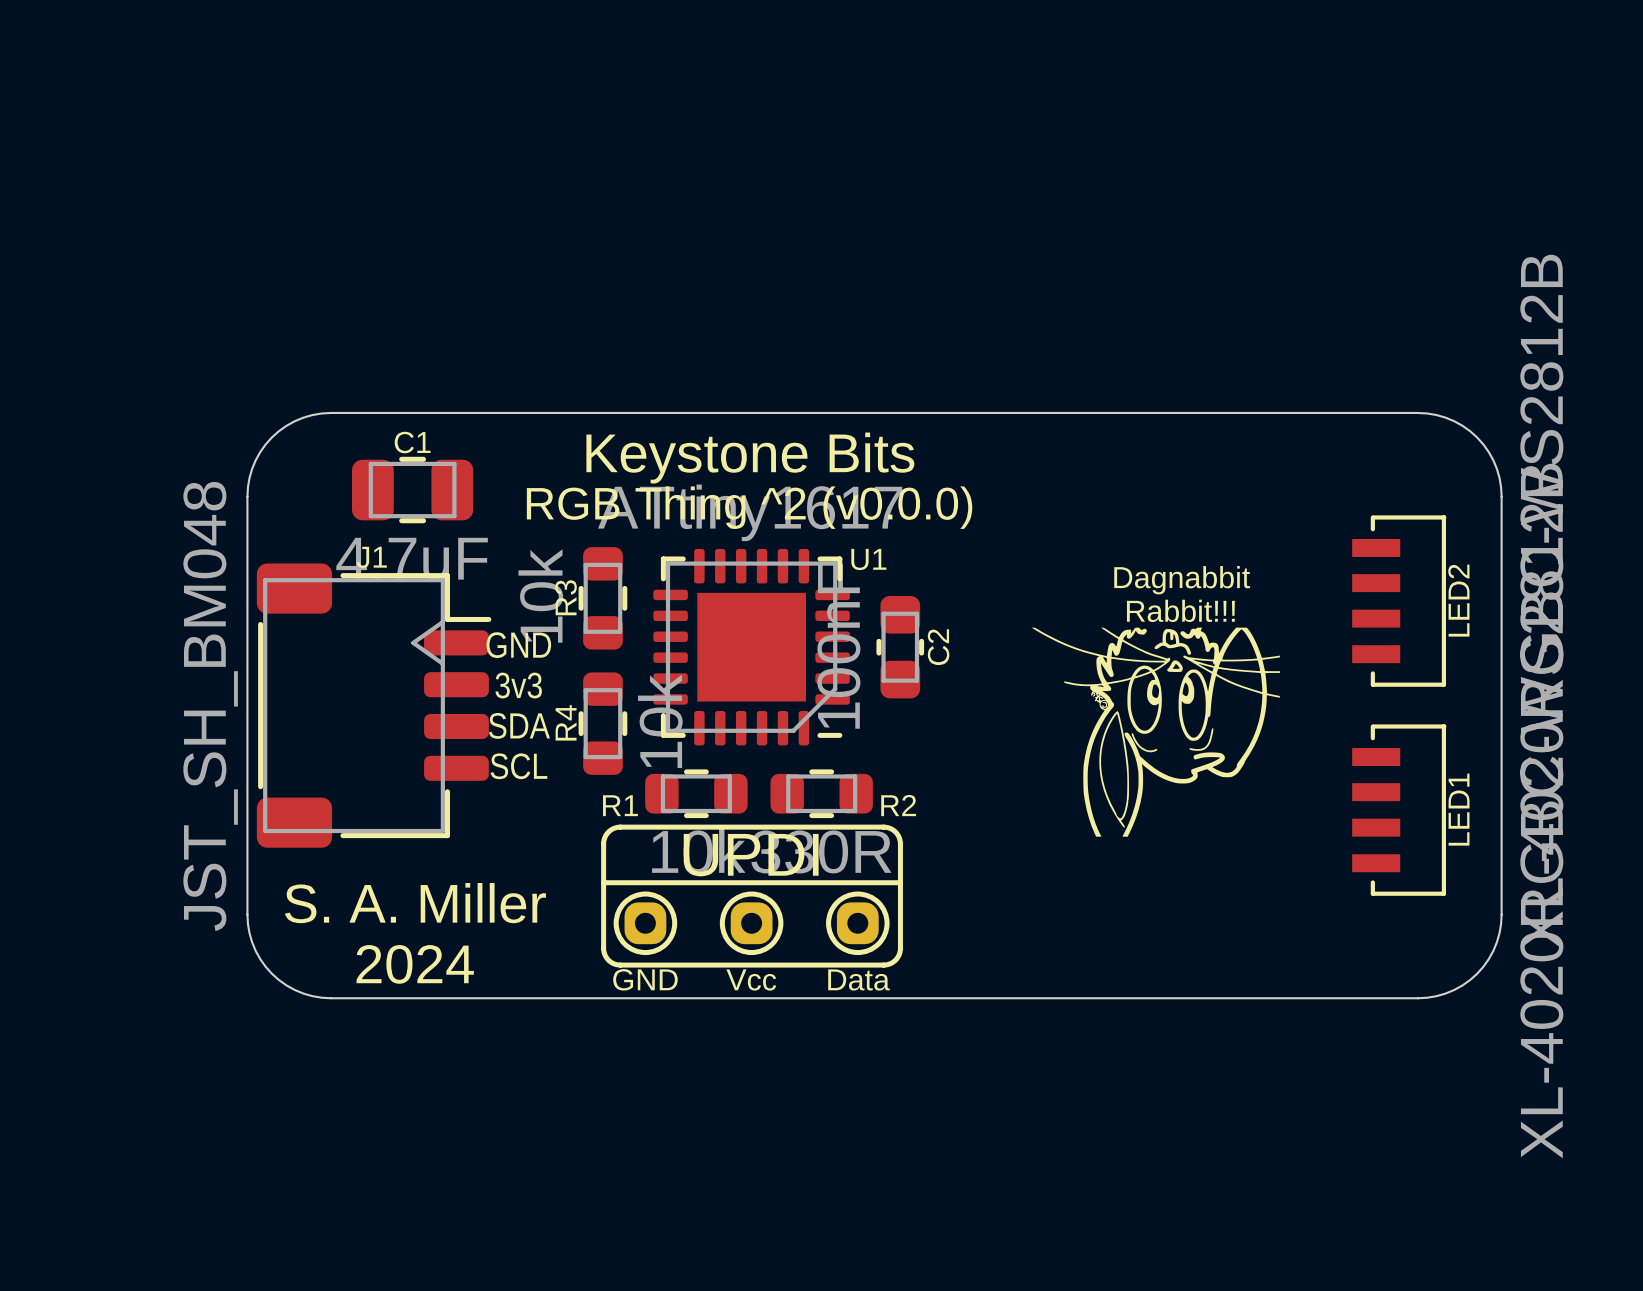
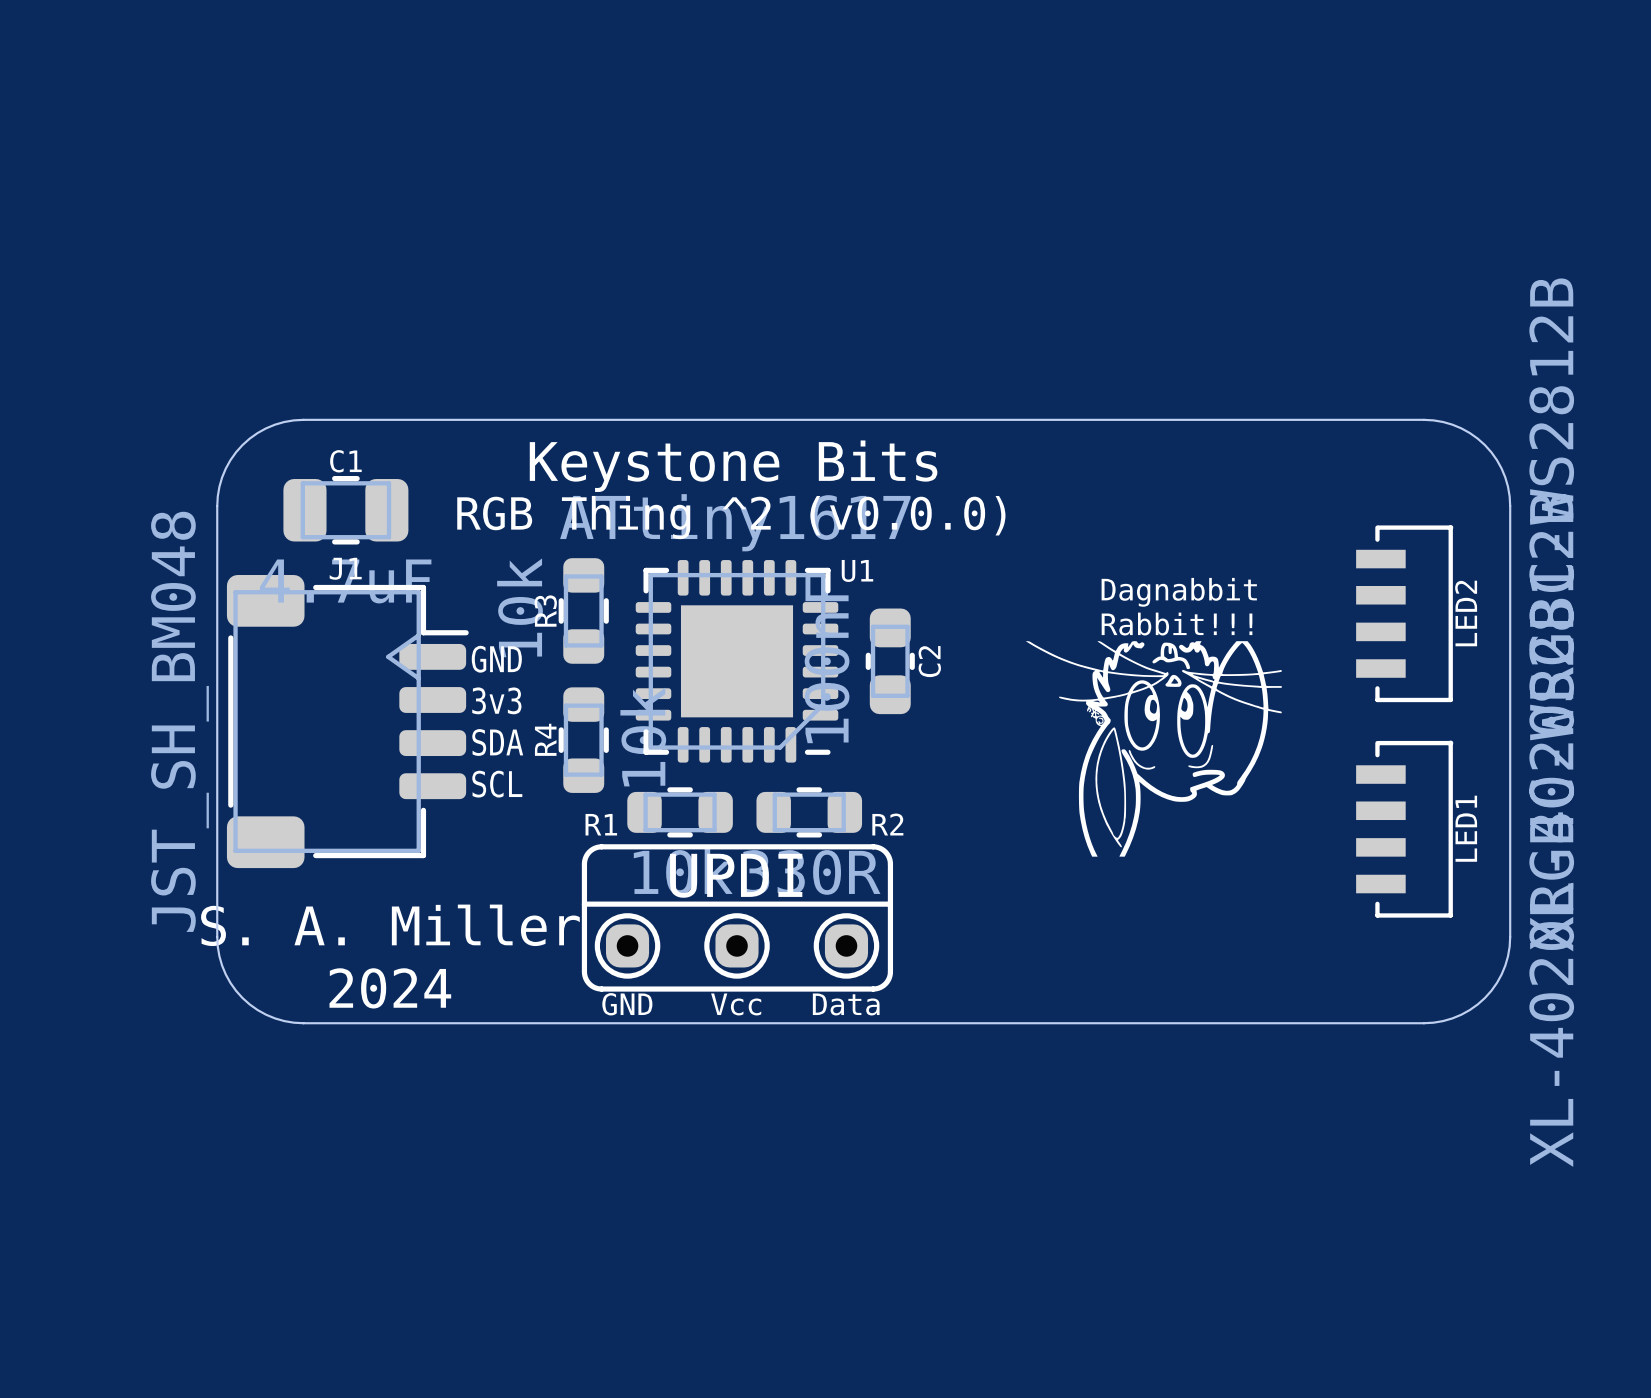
C1 position: (412, 490) -> (345, 510)

